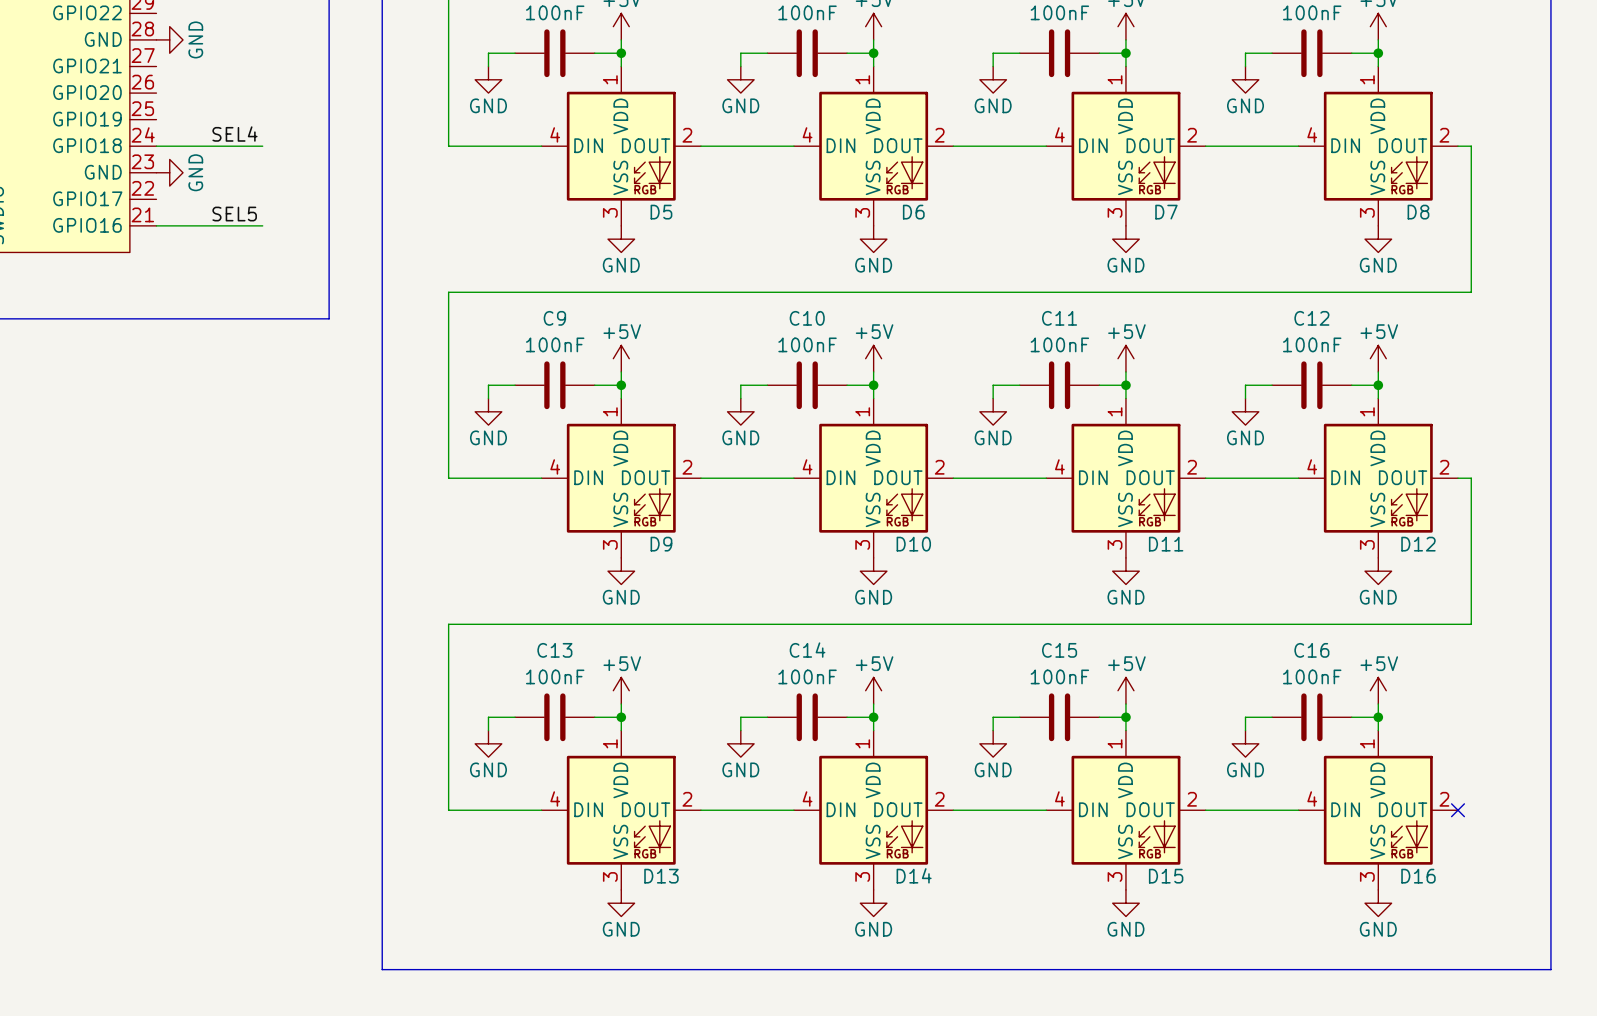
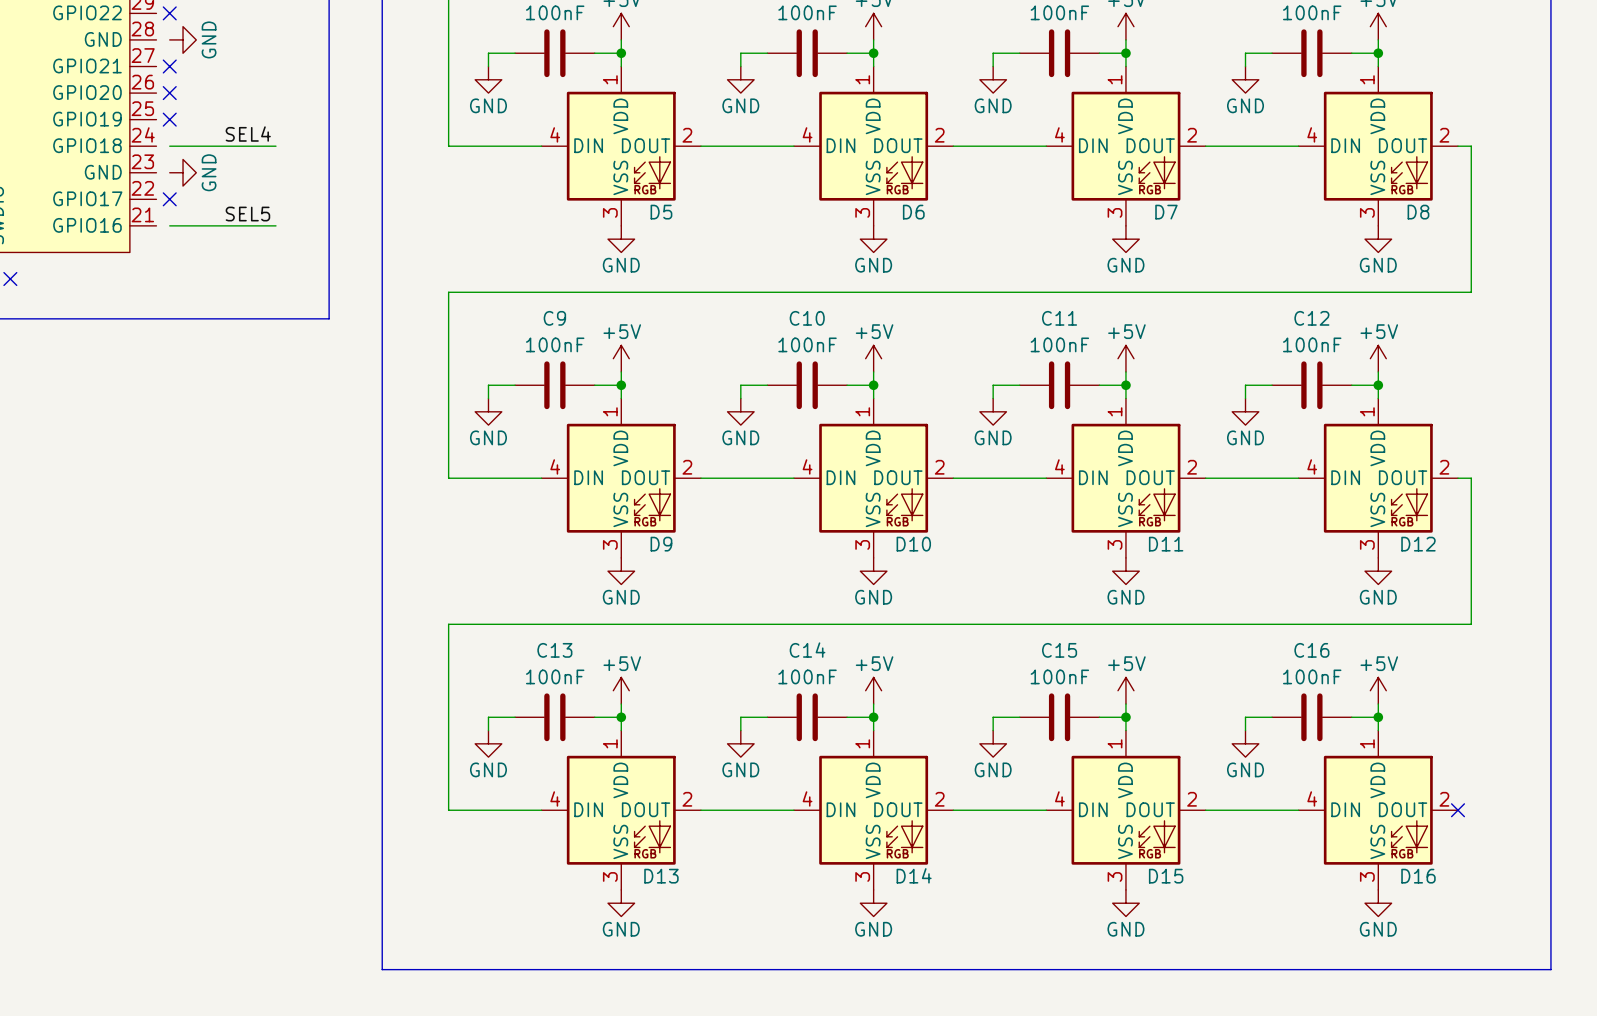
no-connect mark: none -> (169, 13)
power symbol position: GND (169, 39) -> GND (183, 39)
no-connect mark: none -> (169, 66)
no-connect mark: none -> (169, 93)
no-connect mark: none -> (169, 119)
label position: SEL4 (234, 134) -> SEL4 (248, 134)
wire: (156, 146) (169, 146) -> (262, 146) (275, 146)
power symbol position: GND (169, 172) -> GND (183, 172)
no-connect mark: none -> (169, 199)
label position: SEL5 (234, 214) -> SEL5 (247, 214)
wire: (156, 225) (169, 225) -> (262, 225) (275, 225)
no-connect mark: none -> (10, 279)

